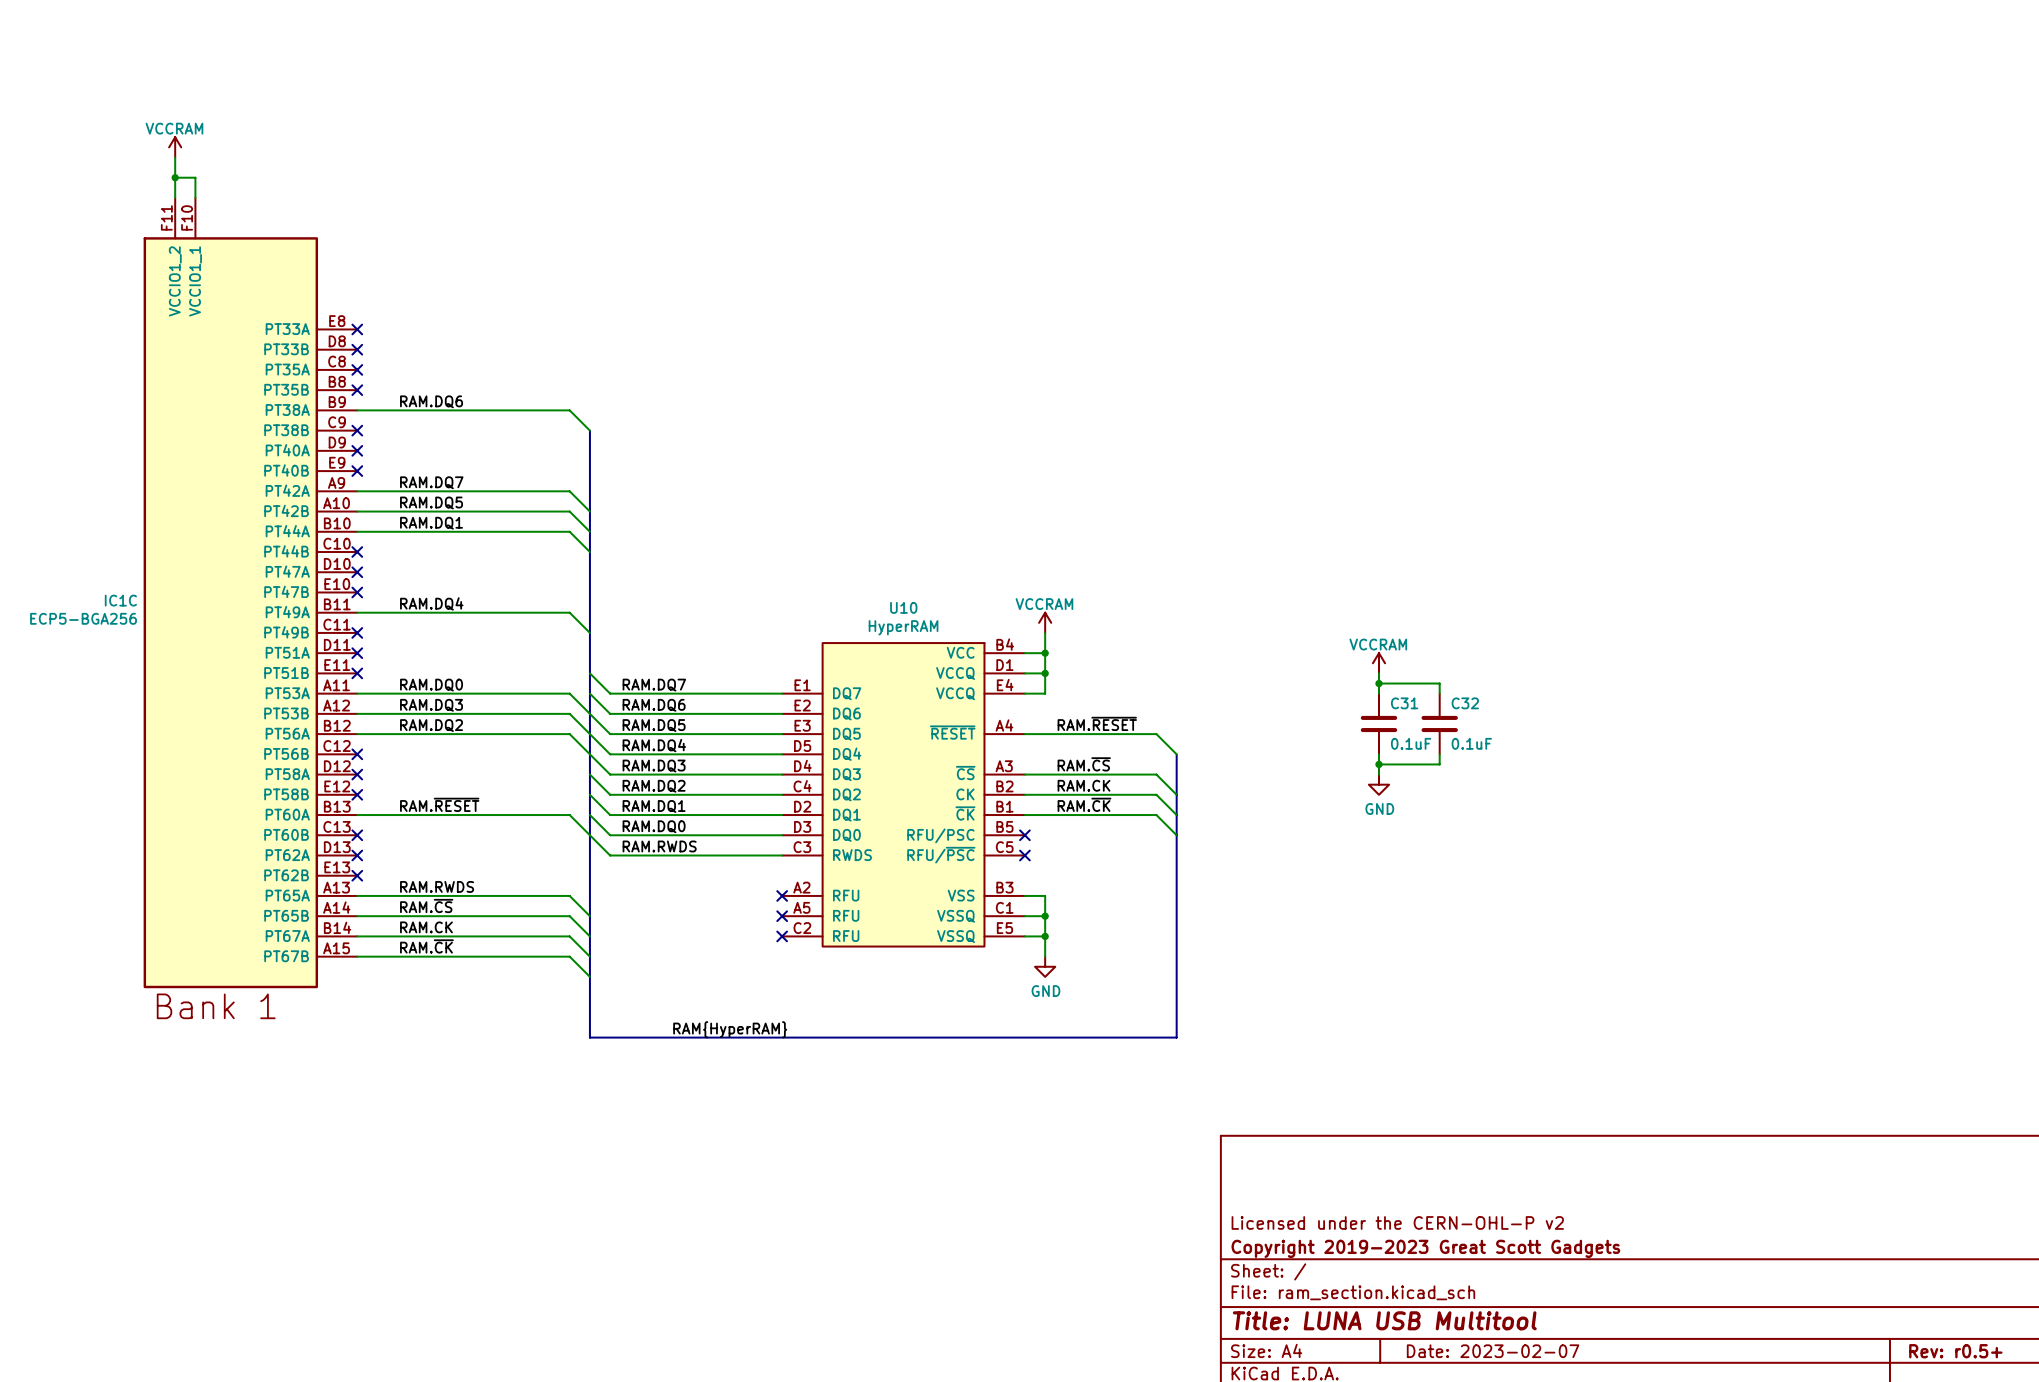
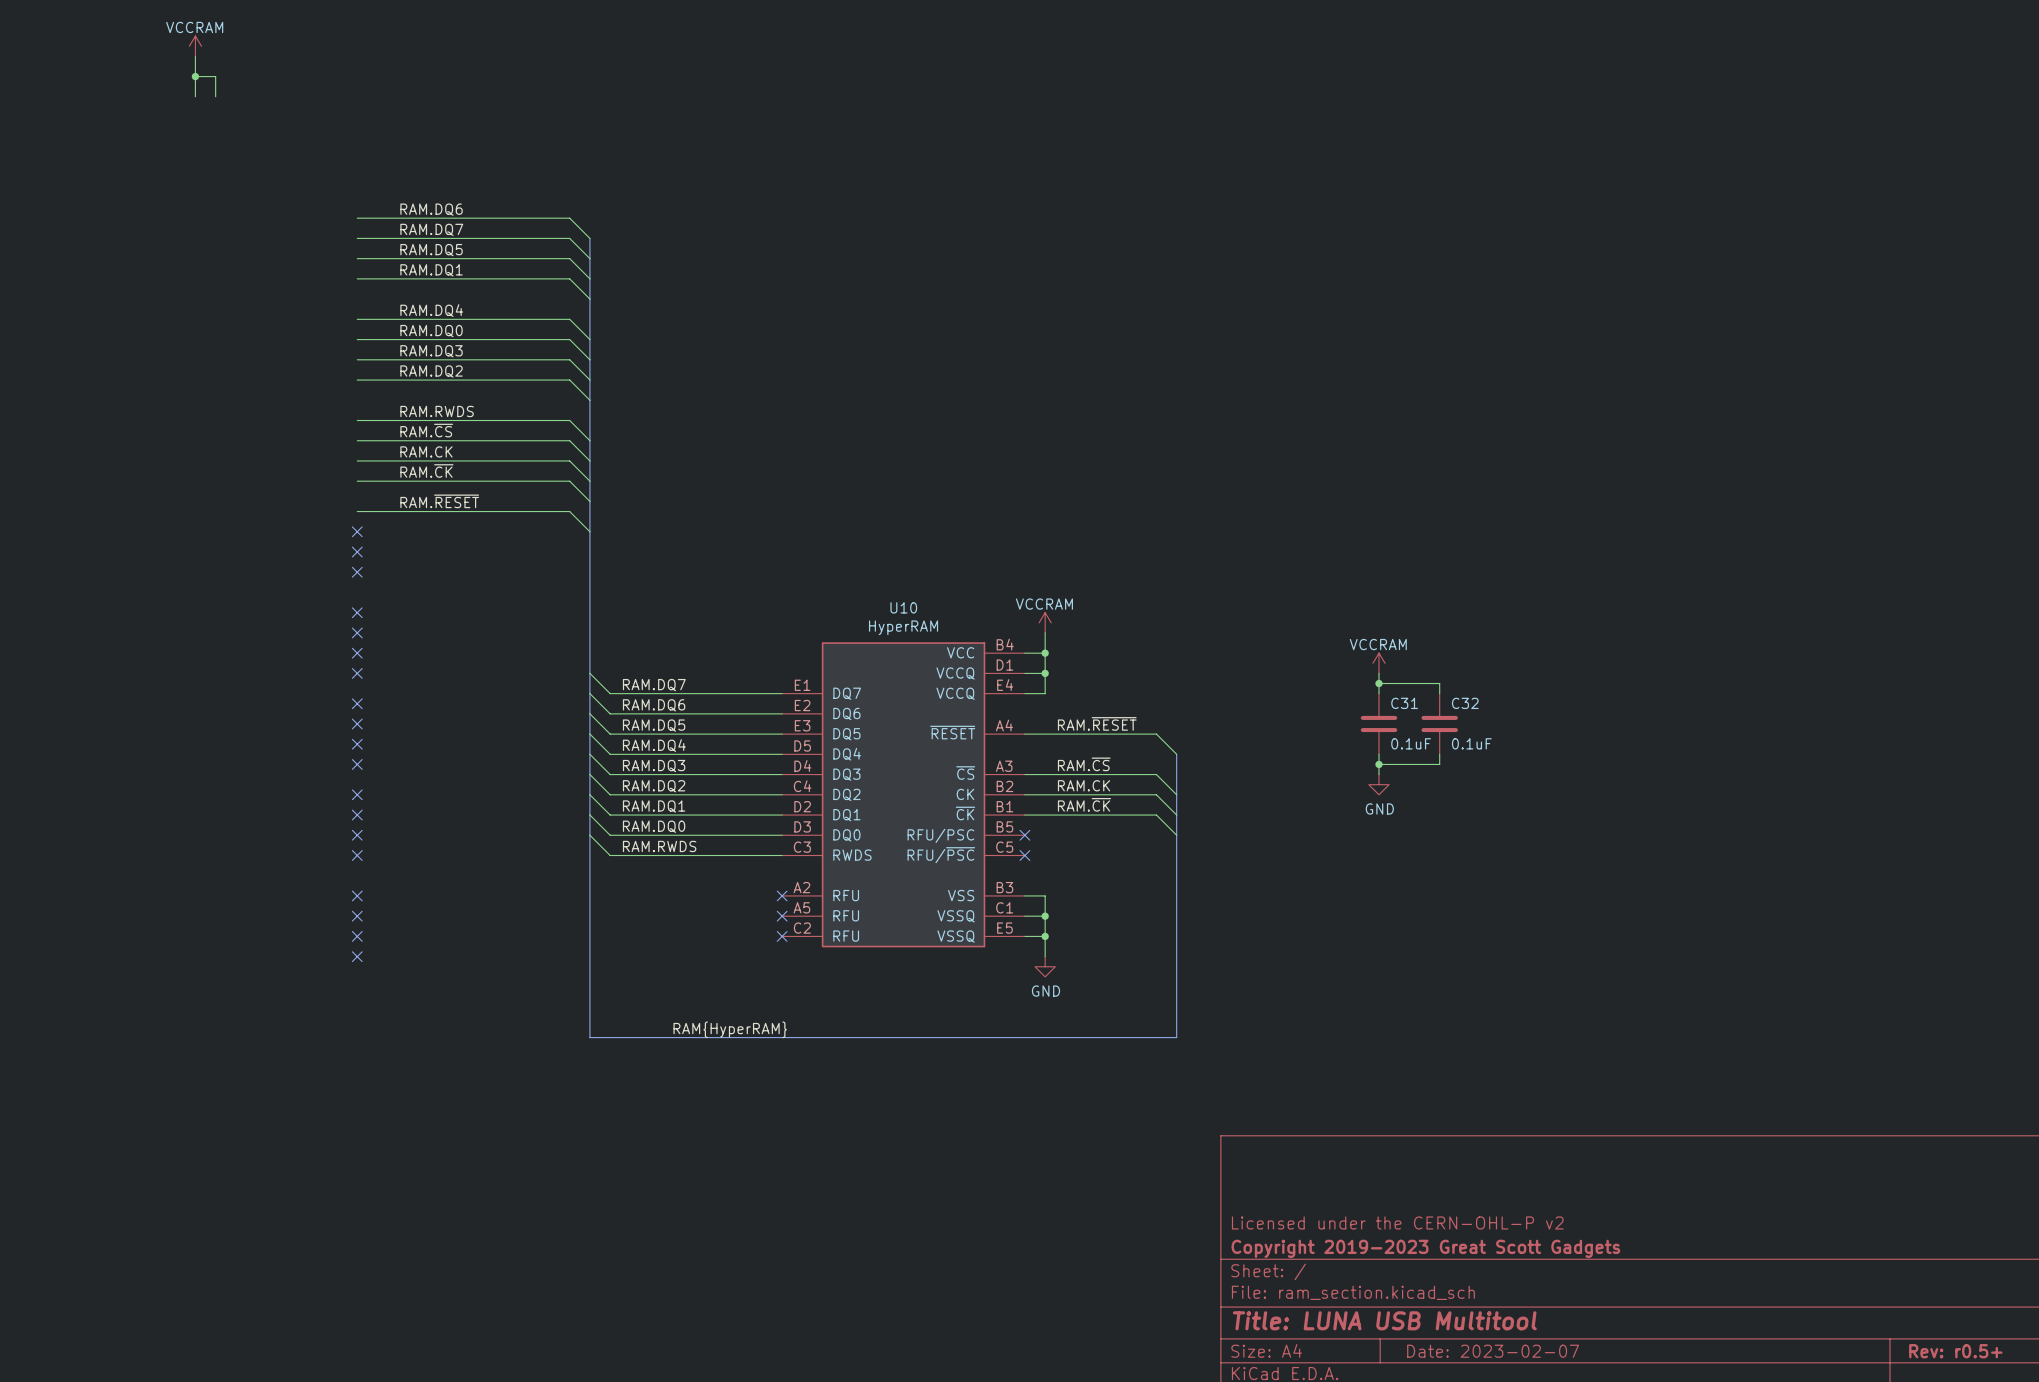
junction: none -> (195, 76)
power symbol position: VCCRAM (175, 147) -> VCCRAM (195, 46)
wire: (175, 157) (175, 197) -> (195, 56) (195, 96)
wire: (175, 177) (195, 177) (195, 197) -> (195, 76) (215, 76) (215, 96)
junction: (175, 177) -> none
wire: none -> (357, 218) (569, 218) (589, 238)
label: none -> RAM.DQ7 (431, 229)
wire: none -> (357, 238) (569, 238) (589, 258)
bus: none -> (589, 238) (589, 430)
label: none -> RAM.DQ5 (431, 250)
label: none -> RAM.DQ1 (431, 270)
wire: none -> (357, 278) (569, 278) (589, 299)
label: none -> RAM.DQ4 (431, 310)
wire: none -> (357, 319) (569, 319) (589, 339)
no-connect mark: (357, 329) -> none
label: none -> RAM.DQ0 (431, 331)
no-connect mark: (357, 349) -> none
label: none -> RAM.DQ3 (431, 351)
wire: none -> (357, 359) (569, 359) (589, 380)
no-connect mark: (357, 369) -> none
label: none -> RAM.DQ2 (431, 371)
no-connect mark: (357, 390) -> none
label position: RAM.DQ6 (431, 401) -> RAM.DQ6 (431, 209)
wire: (357, 410) (569, 410) (589, 430) -> (357, 258) (569, 258) (589, 278)
label: none -> RAM.RWDS (437, 411)
wire: none -> (357, 420) (569, 420) (589, 440)
no-connect mark: (357, 430) -> none
label: none -> RAM.~{CS} (426, 430)
wire: none -> (357, 440) (569, 440) (589, 460)
no-connect mark: (357, 450) -> none
label: none -> RAM.CK (426, 451)
no-connect mark: (357, 471) -> none
label: none -> RAM.~{CK} (426, 471)
wire: none -> (357, 481) (569, 481) (589, 501)
label: RAM.DQ7 (431, 482) -> none
wire: (357, 491) (569, 491) (589, 511) -> (357, 339) (569, 339) (589, 359)
label: RAM.DQ5 (431, 503) -> RAM.~{RESET} (439, 501)
label: RAM.DQ1 (431, 523) -> none
wire: (357, 531) (569, 531) (589, 552) -> (357, 380) (569, 380) (589, 400)
no-connect mark: none -> (357, 531)
no-connect mark position: (357, 592) -> (357, 612)
IC1C: ECP5-BGA256 (250, 593) -> none
label: RAM.DQ4 (431, 603) -> none
wire: (357, 612) (569, 612) (589, 632) -> (357, 460) (569, 460) (589, 481)
label: RAM.DQ0 (431, 685) -> none
wire: (357, 693) (569, 693) (589, 713) -> none
no-connect mark: none -> (357, 703)
label: RAM.DQ3 (431, 705) -> none
wire: (357, 713) (569, 713) (589, 734) -> none
no-connect mark: none -> (357, 723)
label: RAM.DQ2 (431, 725) -> none
wire: (357, 734) (569, 734) (589, 754) -> none
no-connect mark: none -> (357, 744)
no-connect mark: (357, 754) -> none
no-connect mark: none -> (357, 764)
no-connect mark: (357, 774) -> none
label: RAM.~{RESET} (439, 804) -> none
wire: (357, 815) (569, 815) (589, 835) -> none
no-connect mark: none -> (357, 815)
no-connect mark: (357, 875) -> none
label: RAM.RWDS (437, 886) -> none
wire: (357, 895) (569, 895) (589, 916) -> none
no-connect mark: none -> (357, 895)
label: RAM.~{CS} (426, 906) -> none
wire: (357, 916) (569, 916) (589, 936) -> none
no-connect mark: none -> (357, 916)
label: RAM.CK (426, 927) -> none
wire: (357, 936) (569, 936) (589, 956) -> none
no-connect mark: none -> (357, 936)
label: RAM.~{CK} (426, 946) -> none
wire: (357, 956) (569, 956) (589, 976) -> none
no-connect mark: none -> (357, 956)

